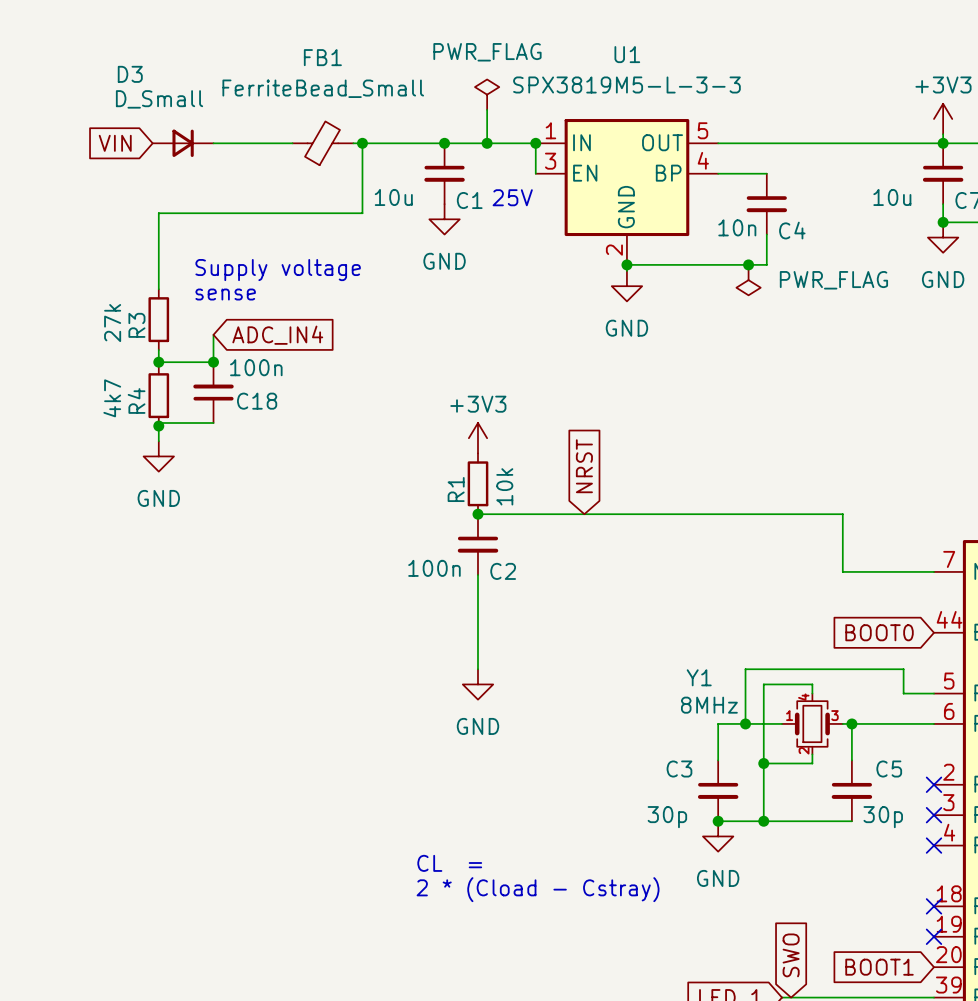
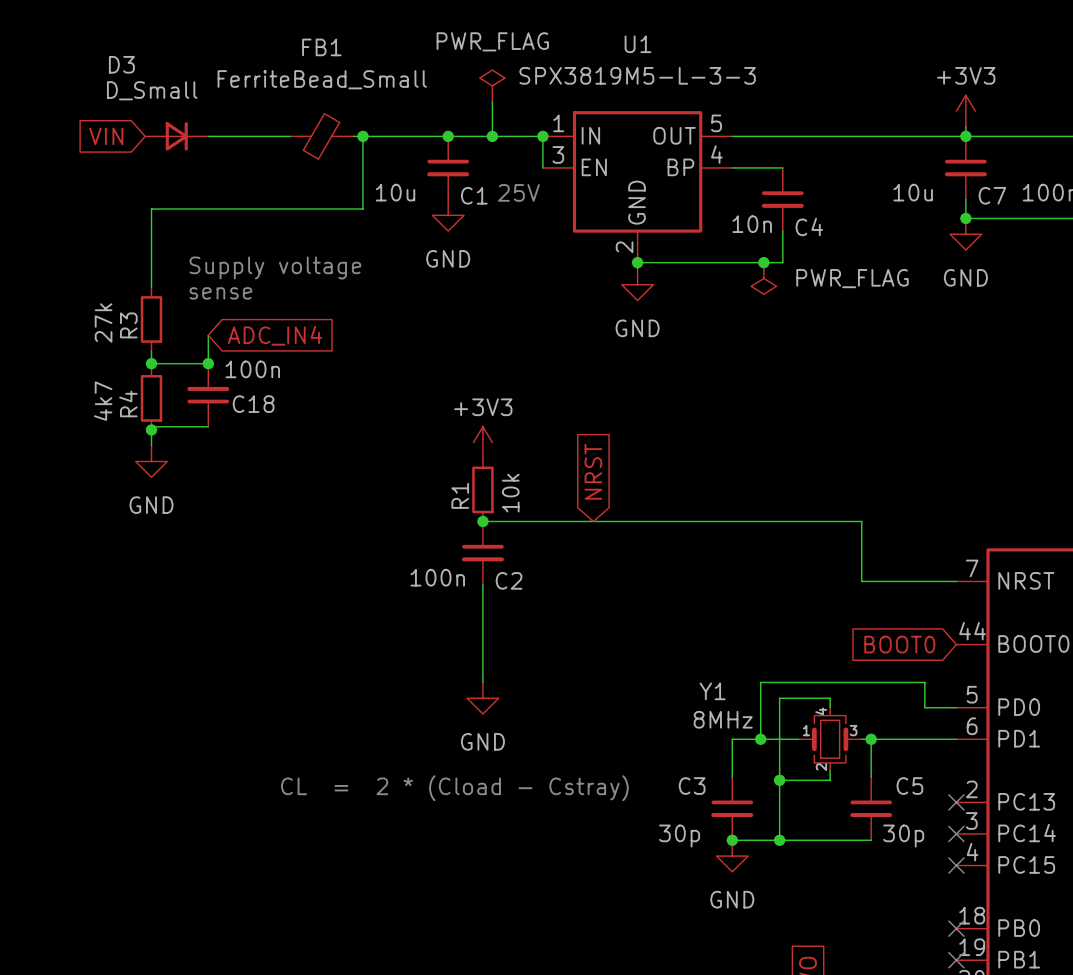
text: none -> CL = 2 * (Cload - Cstray) (454, 788)
text: CL = (449, 863) -> none
text: 2 * (Cload - Cstray) (538, 889) -> none

